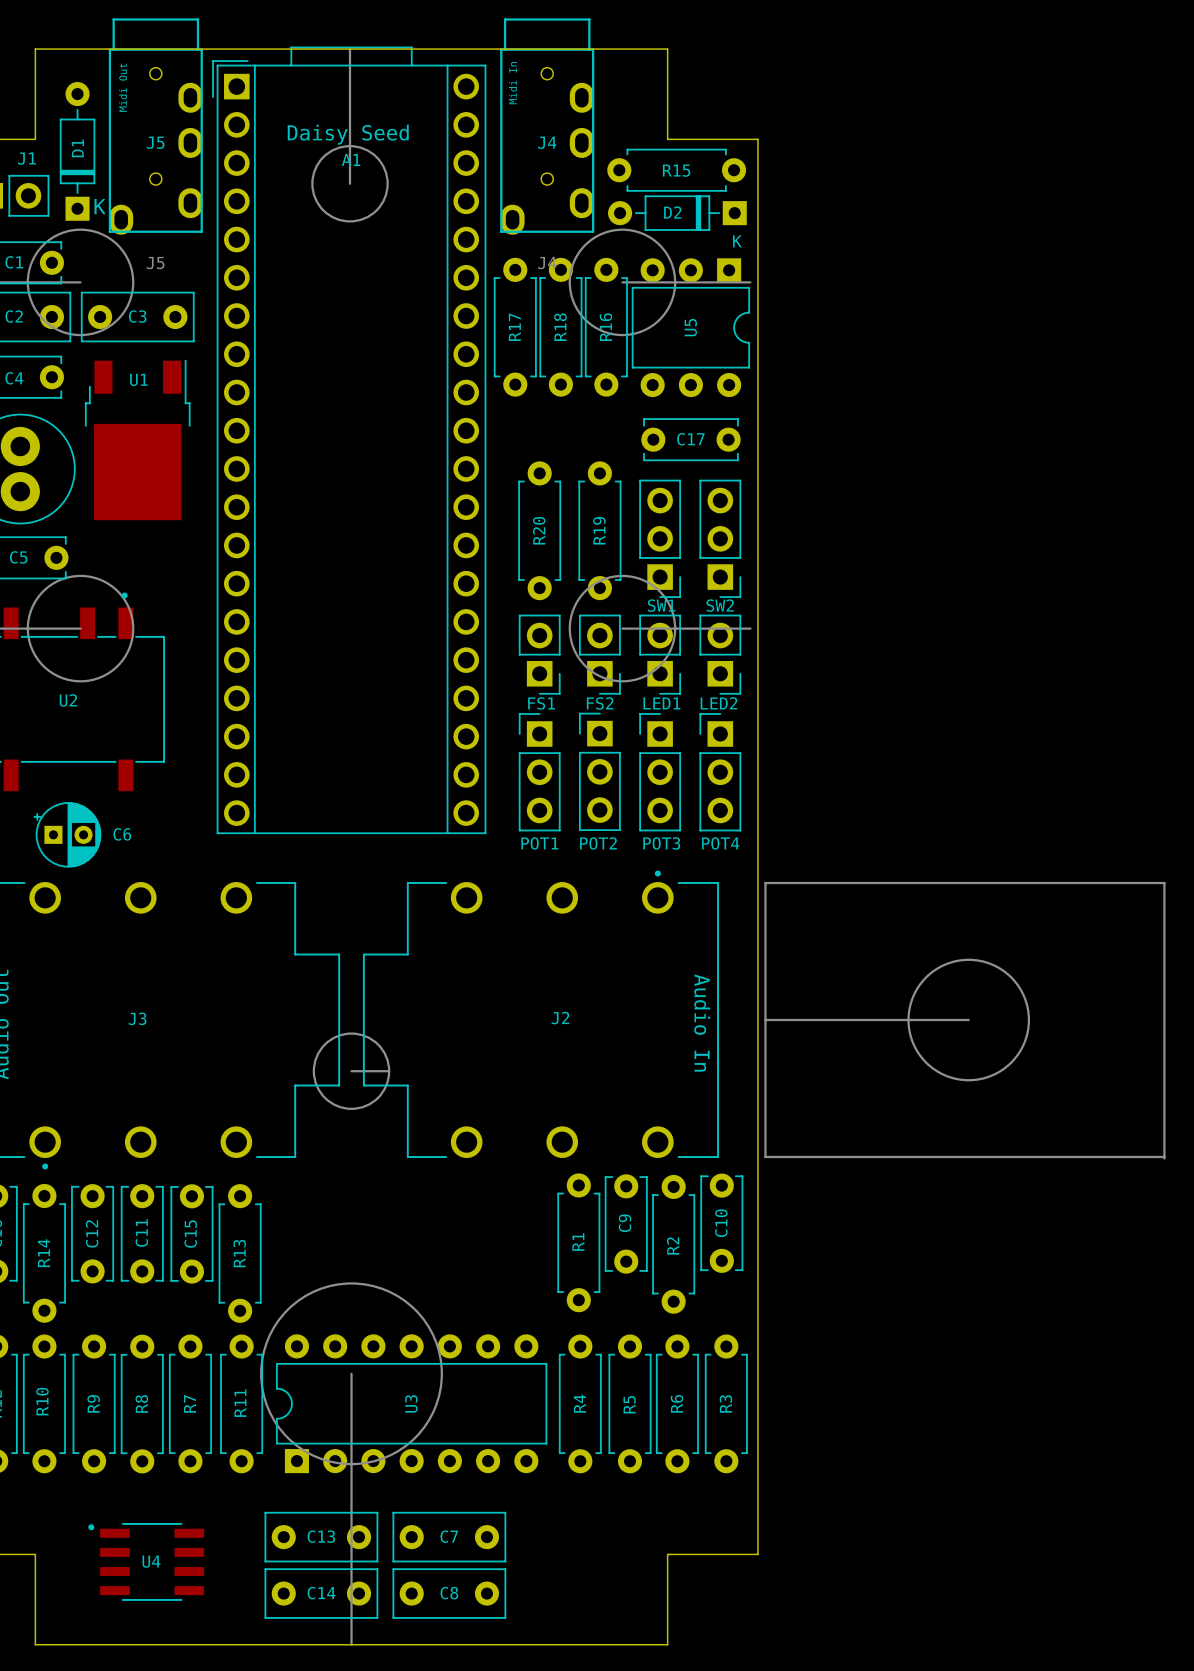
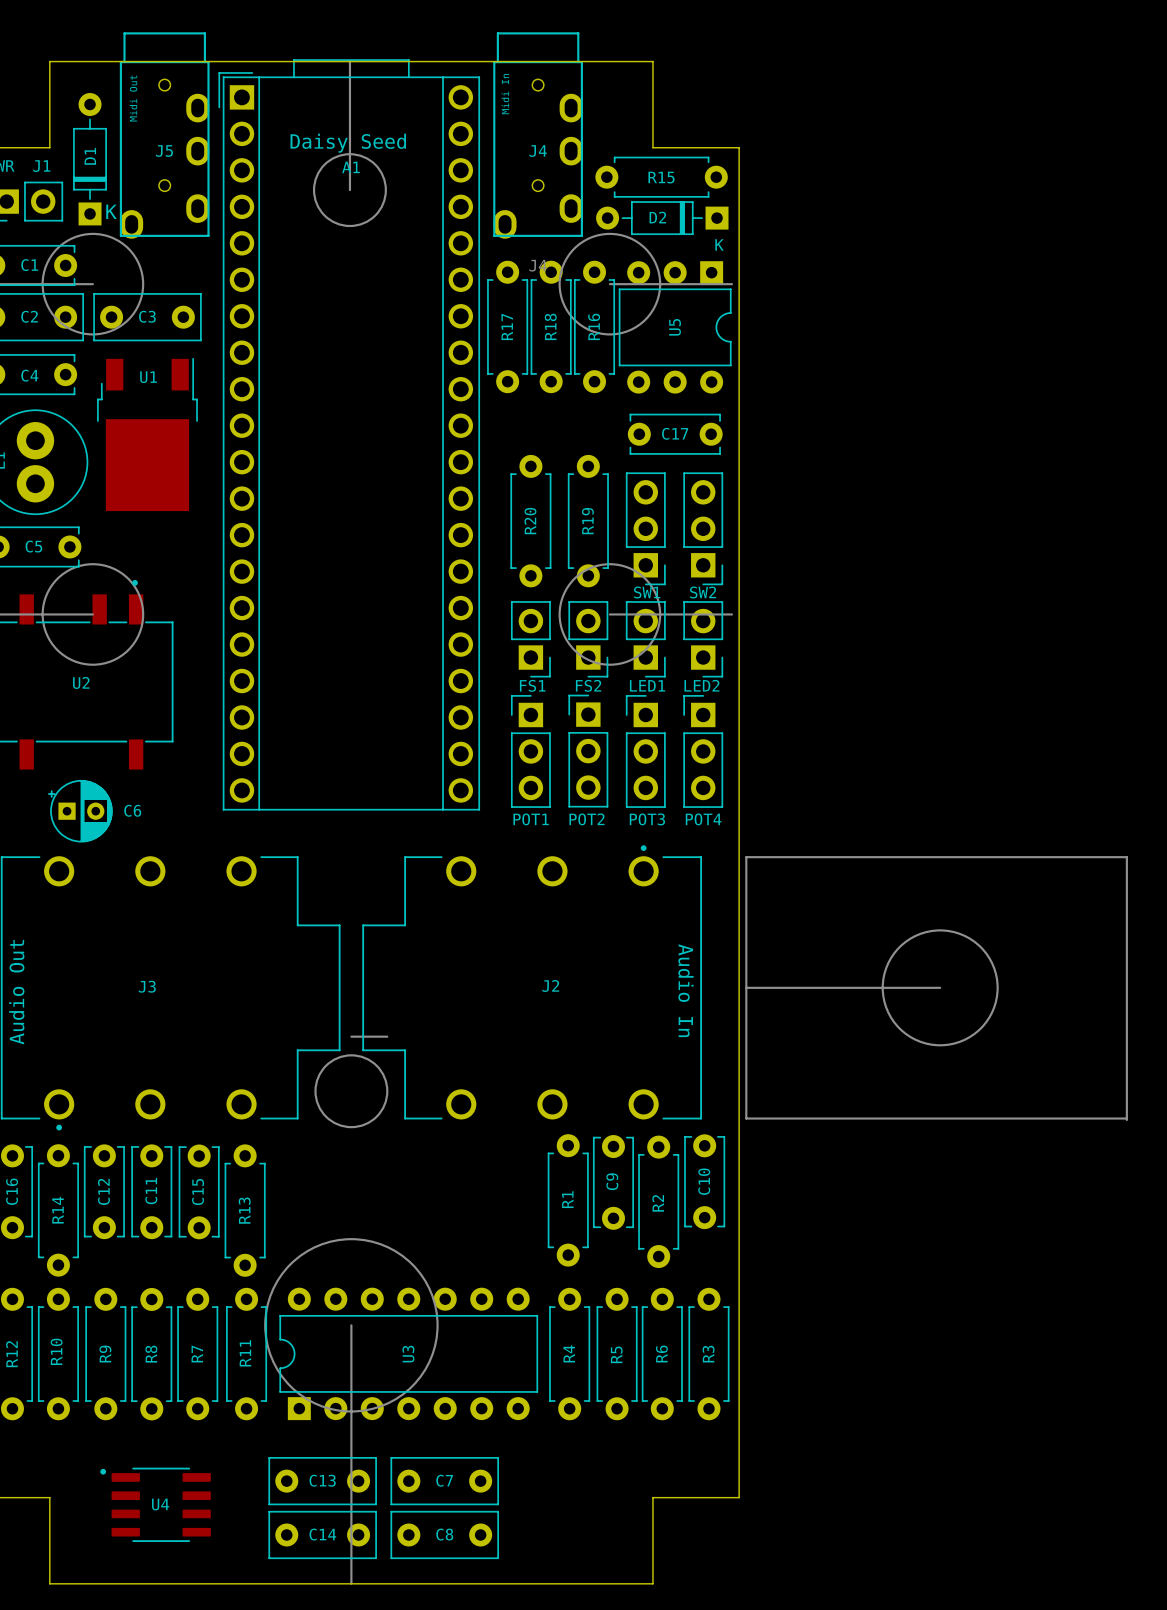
J5 name: J5 (155, 263) -> none
drawing position: (351, 1071) -> (351, 1091)

